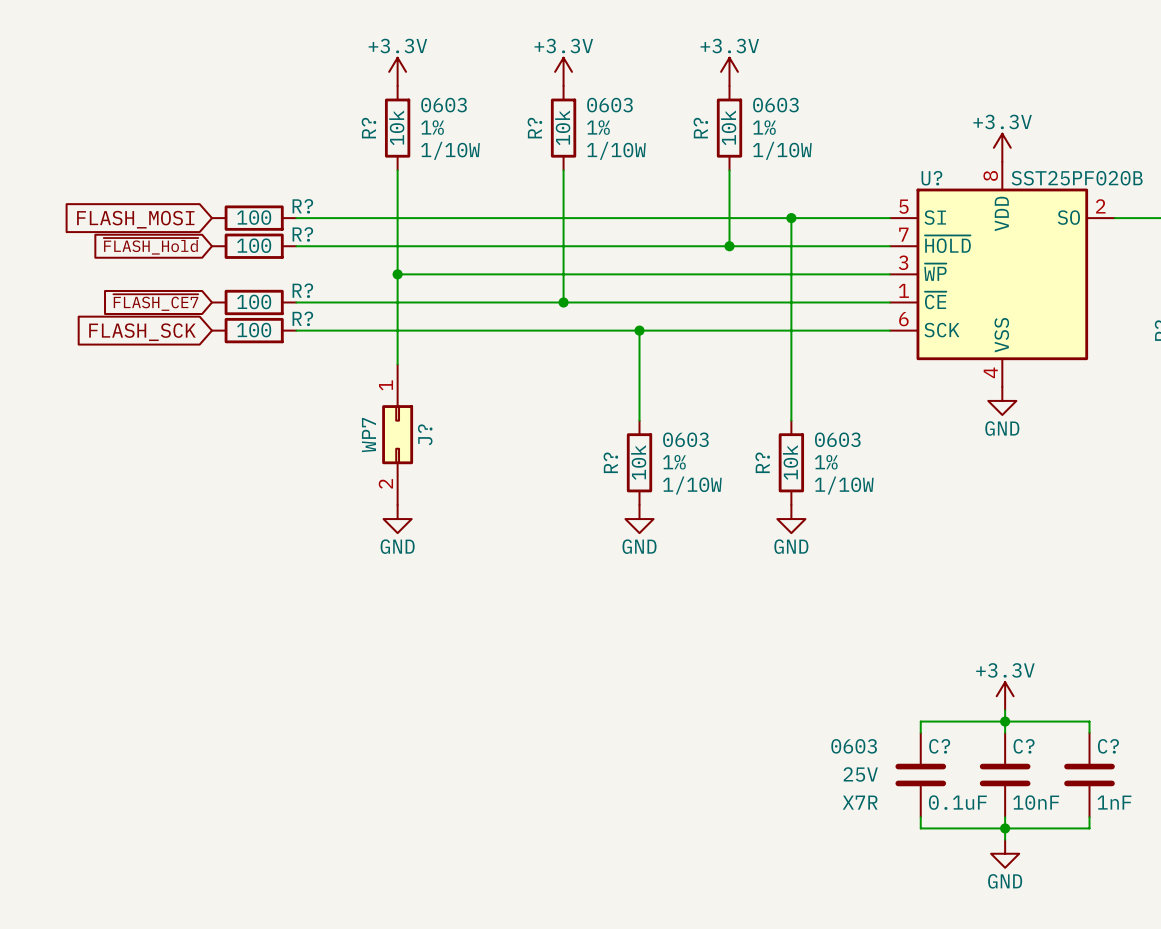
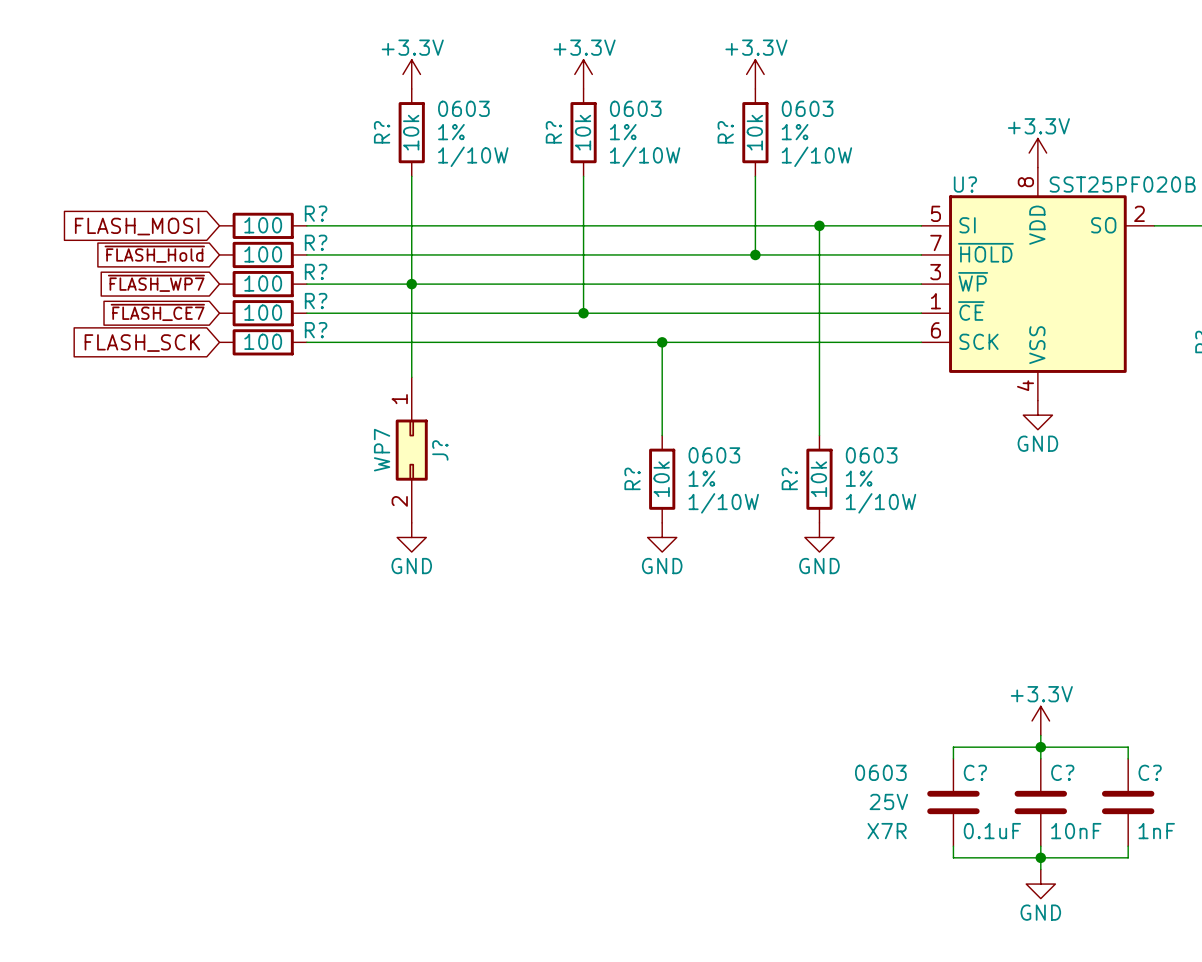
global label: none -> ~{FLASH_WP7} (156, 283)
R?: none -> 100 (263, 284)
wire: none -> (306, 284) (411, 284)

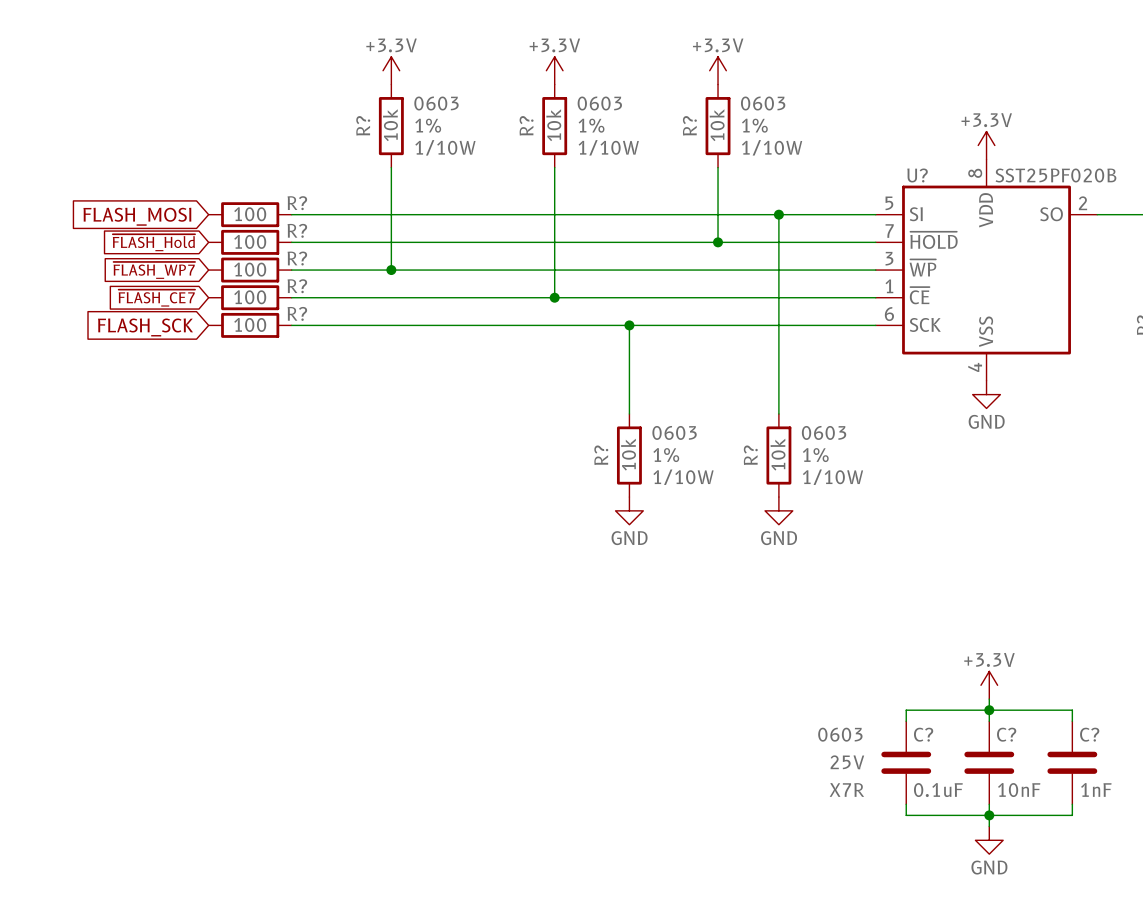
wire: (411, 284) (411, 377) -> none
J?: WP7 (411, 450) -> none
power symbol: GND (411, 537) -> none

